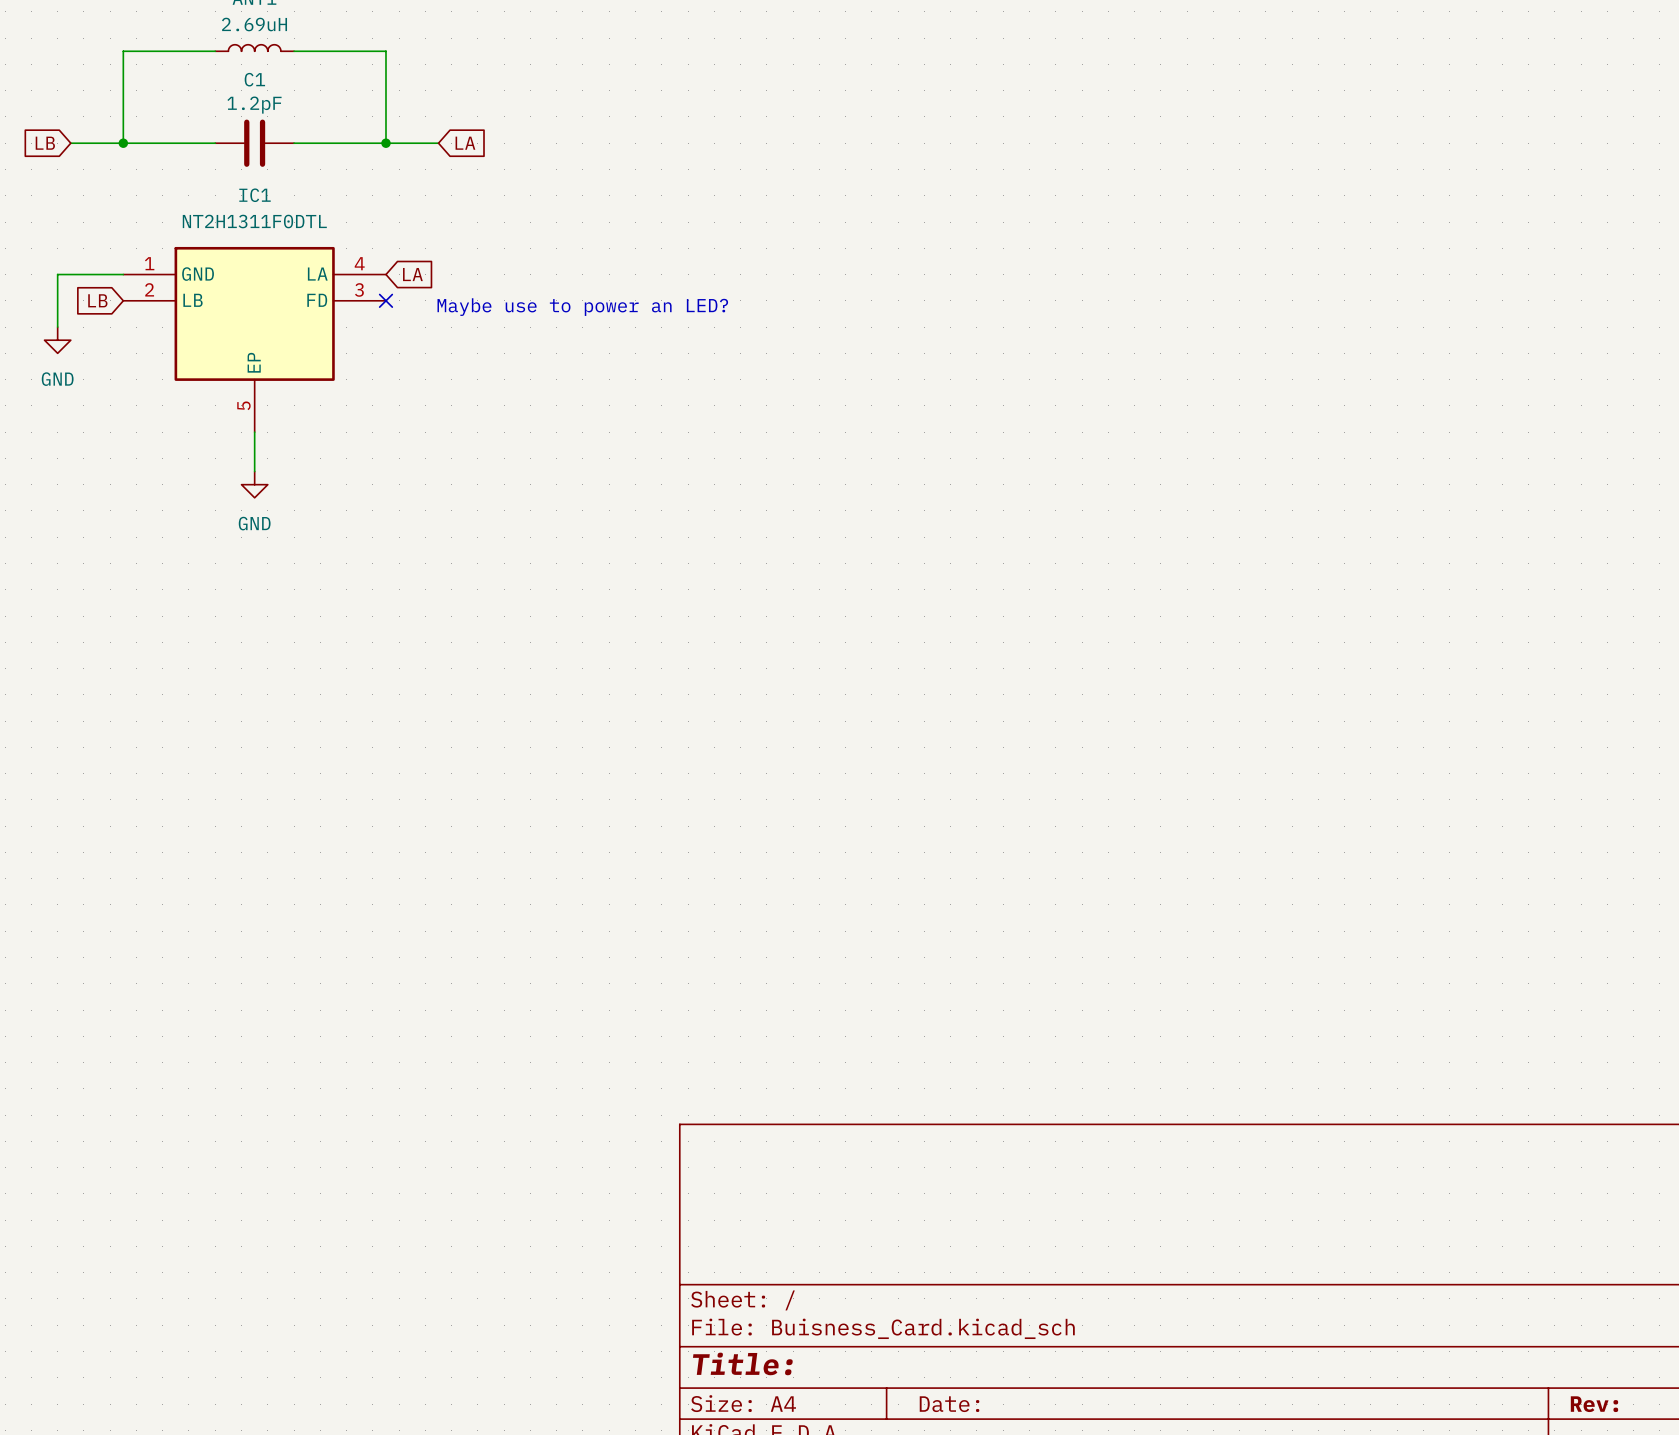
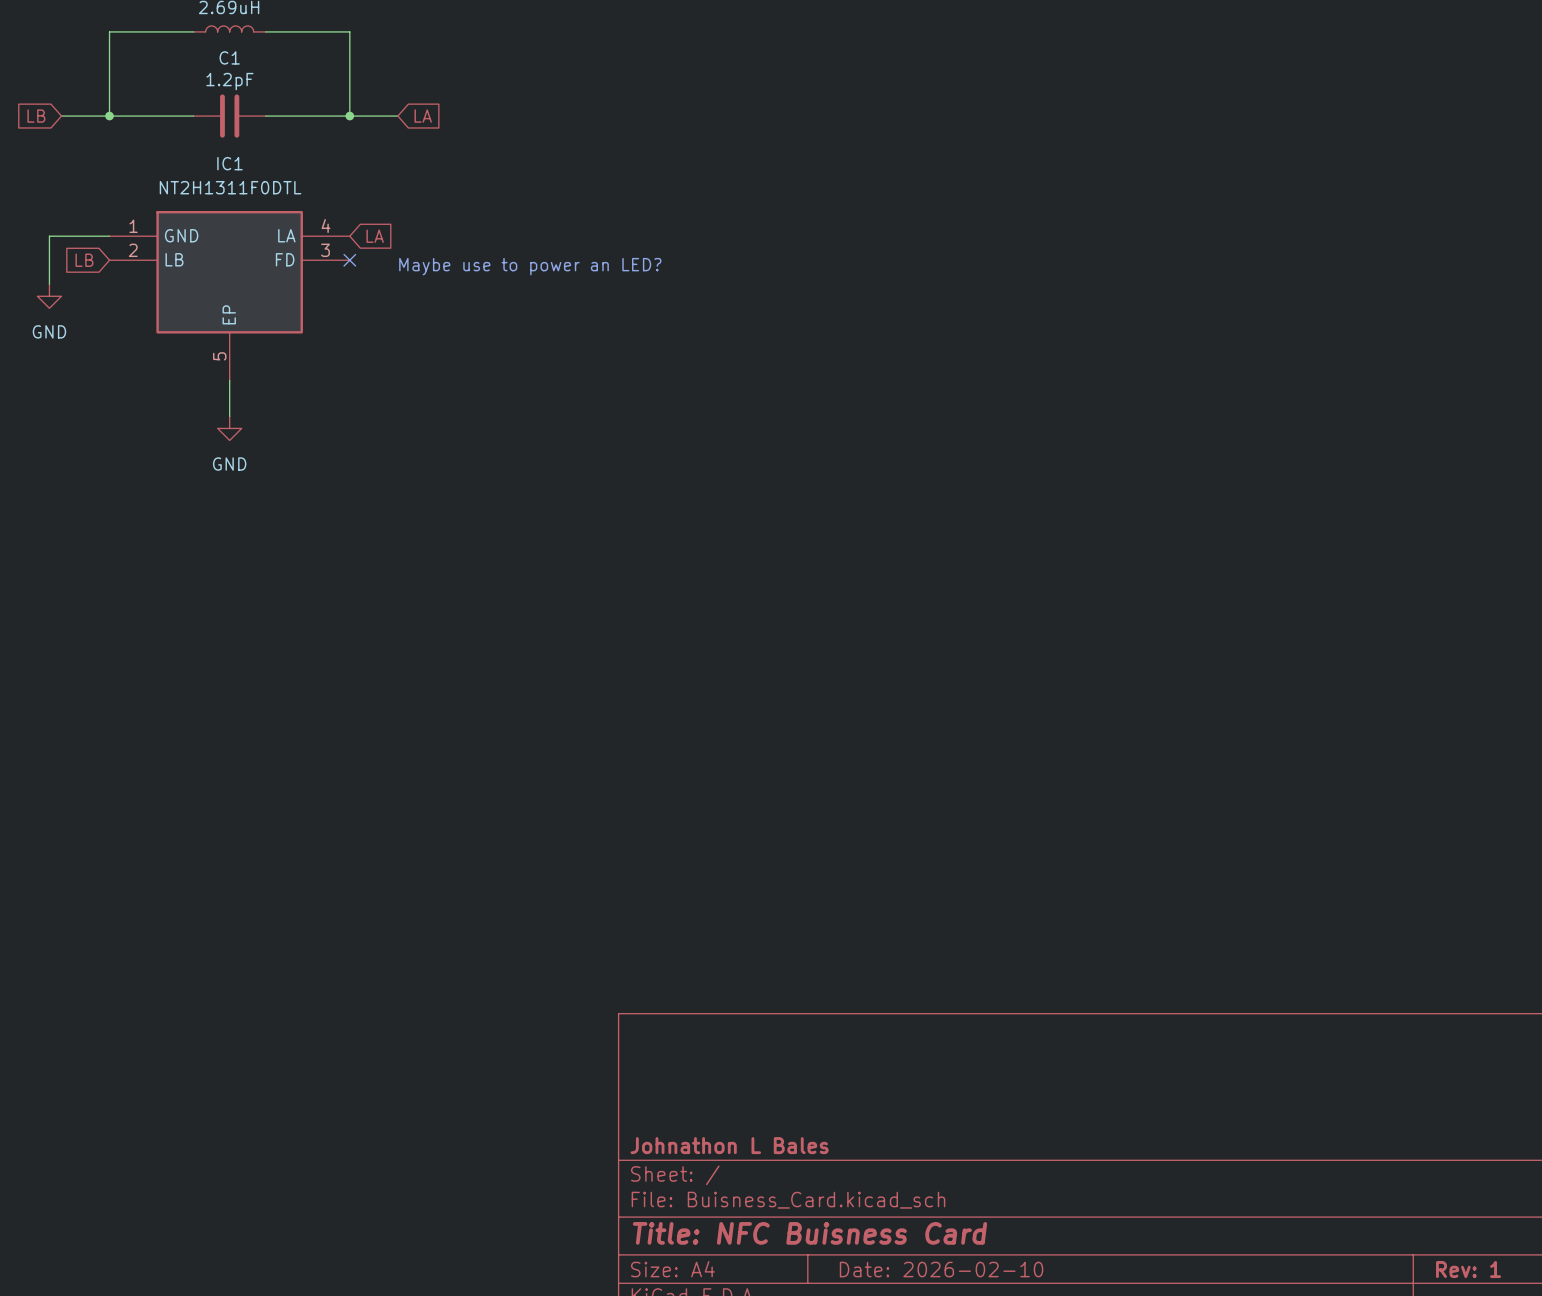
title block: none -> Johnathon L Bales (729, 1145)
title block: Title: (742, 1363) -> Title: NFC Buisness Card (809, 1233)
title block: Date: (949, 1404) -> Date: 2026-02-10 (941, 1269)
title block: Rev: (1594, 1404) -> Rev: 1 (1468, 1269)

